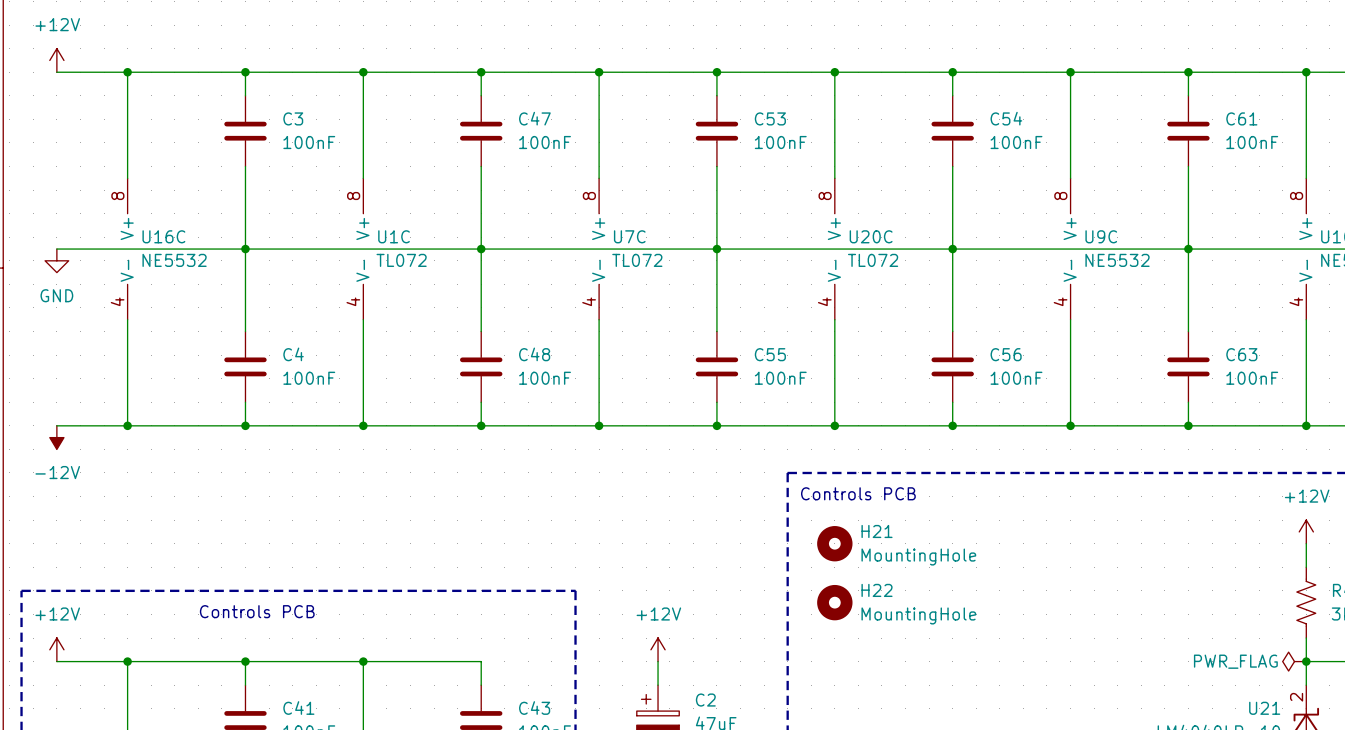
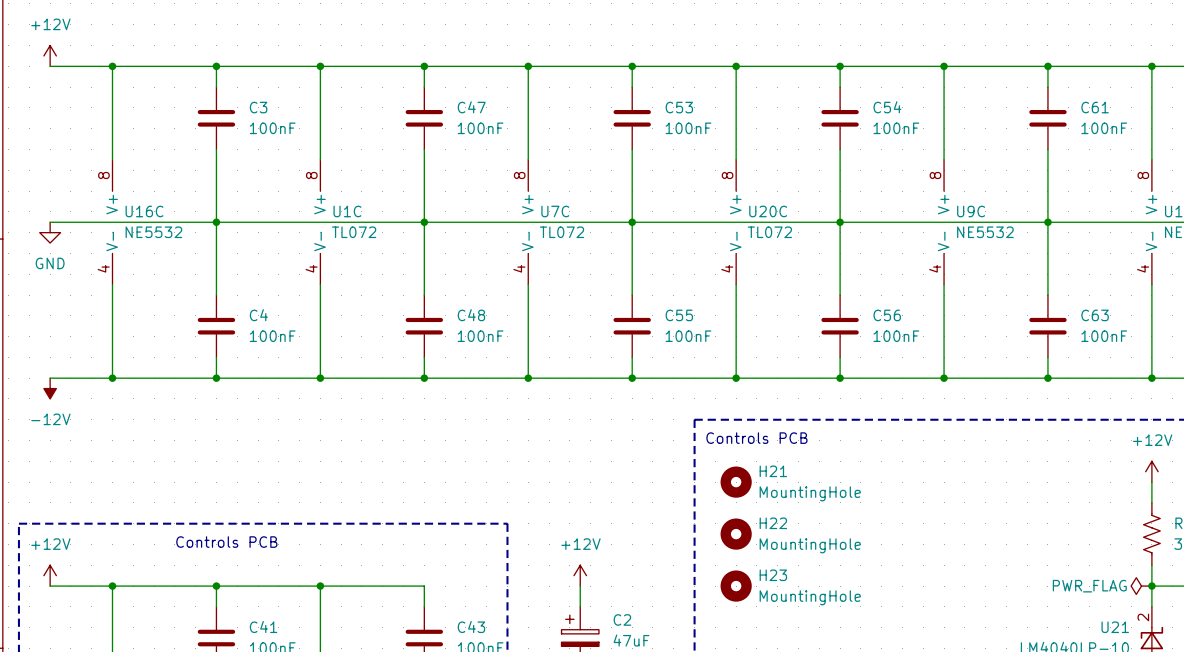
H23: none -> MountingHole (736, 586)

